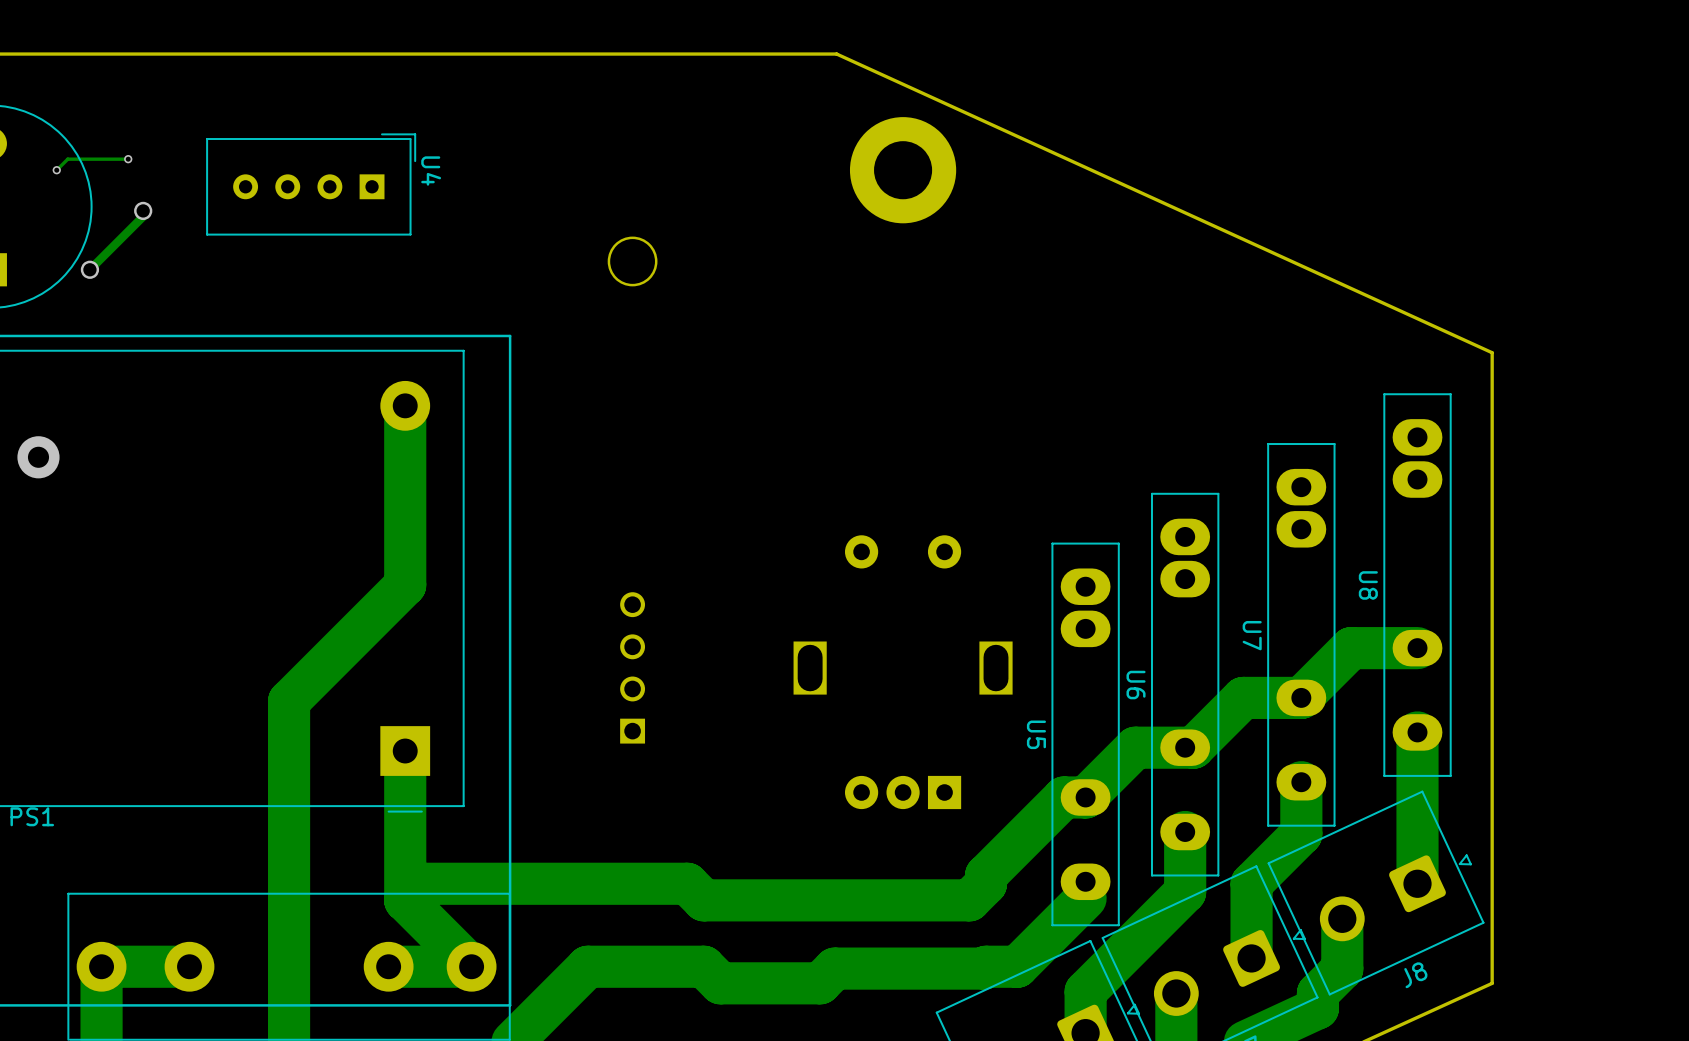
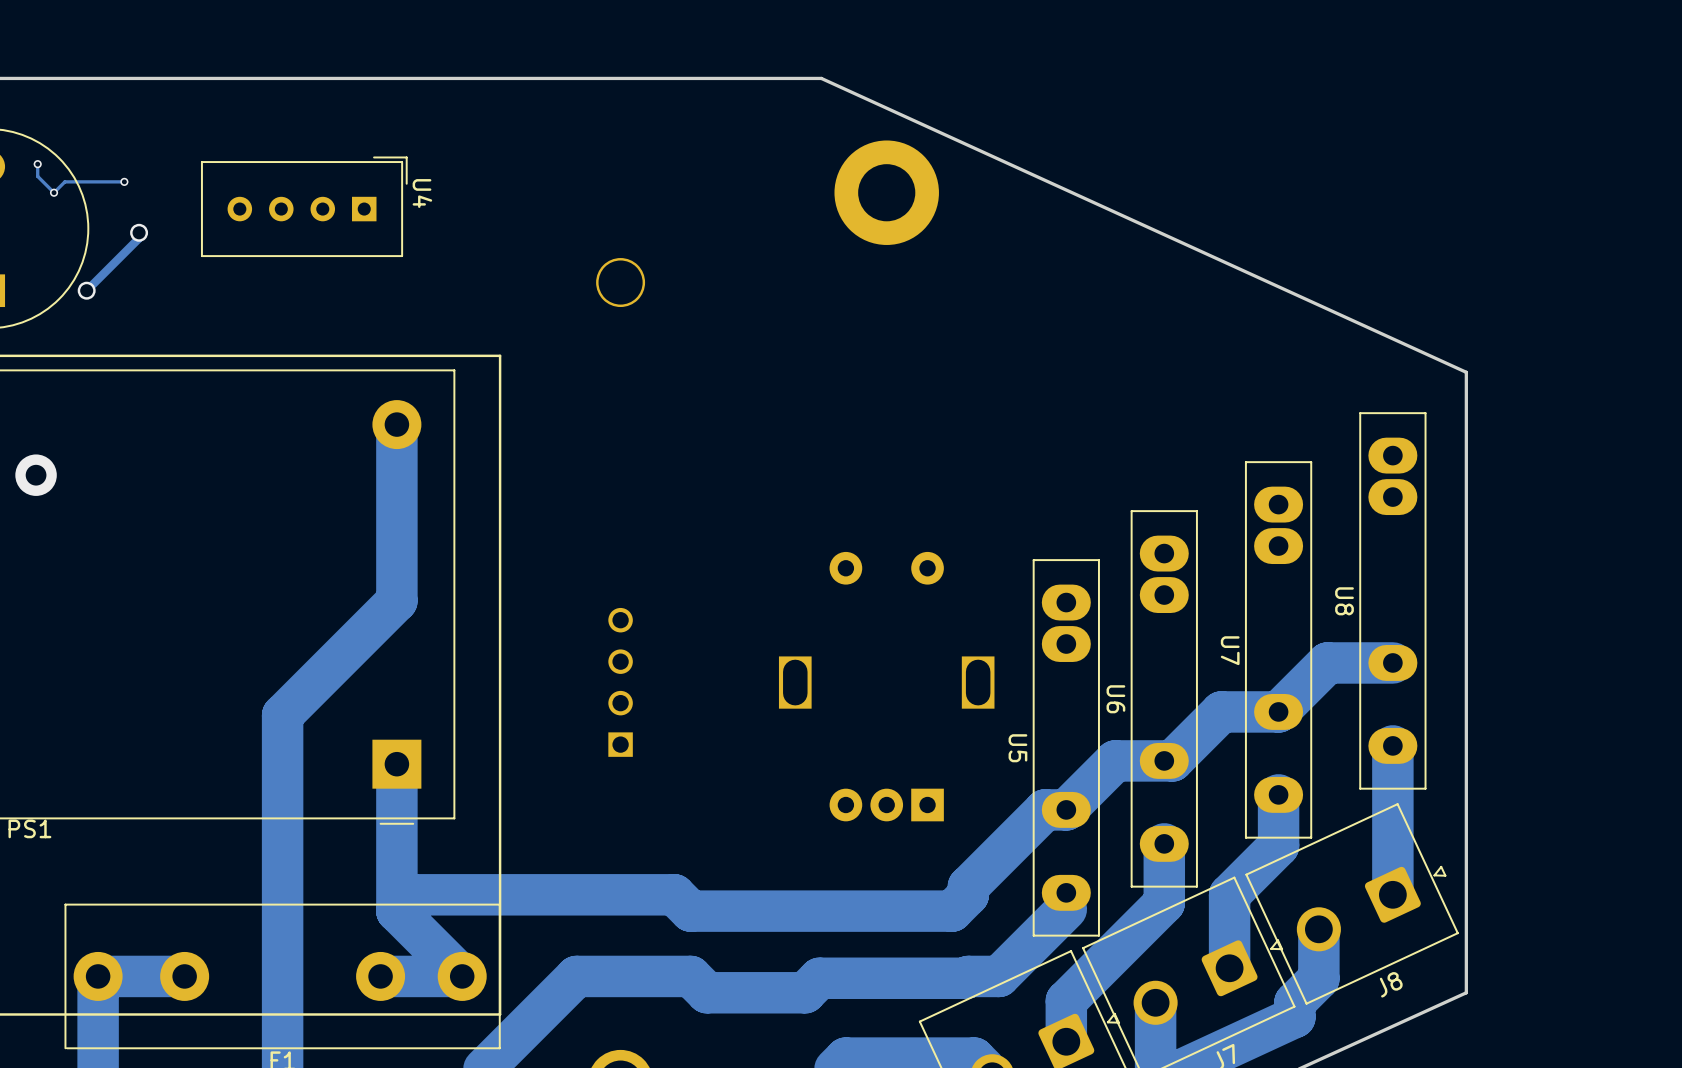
track: none -> (37, 164) (37, 176) (54, 192)
via: none -> (37, 164)

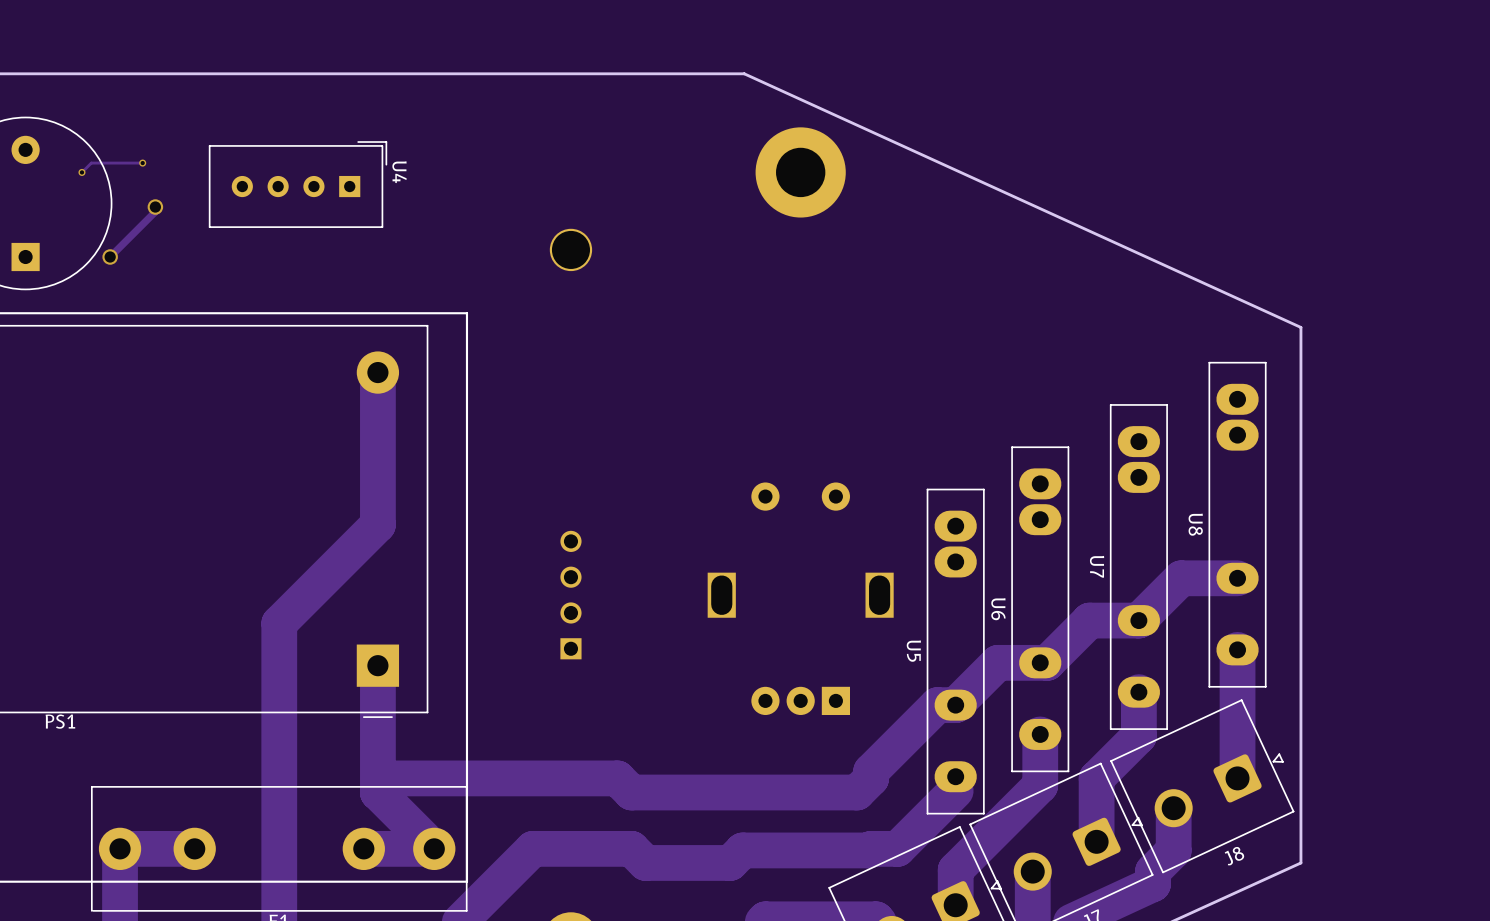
track: (37, 164) (37, 176) (54, 192) -> none
via: (37, 164) -> none
via: (36, 475) -> none

